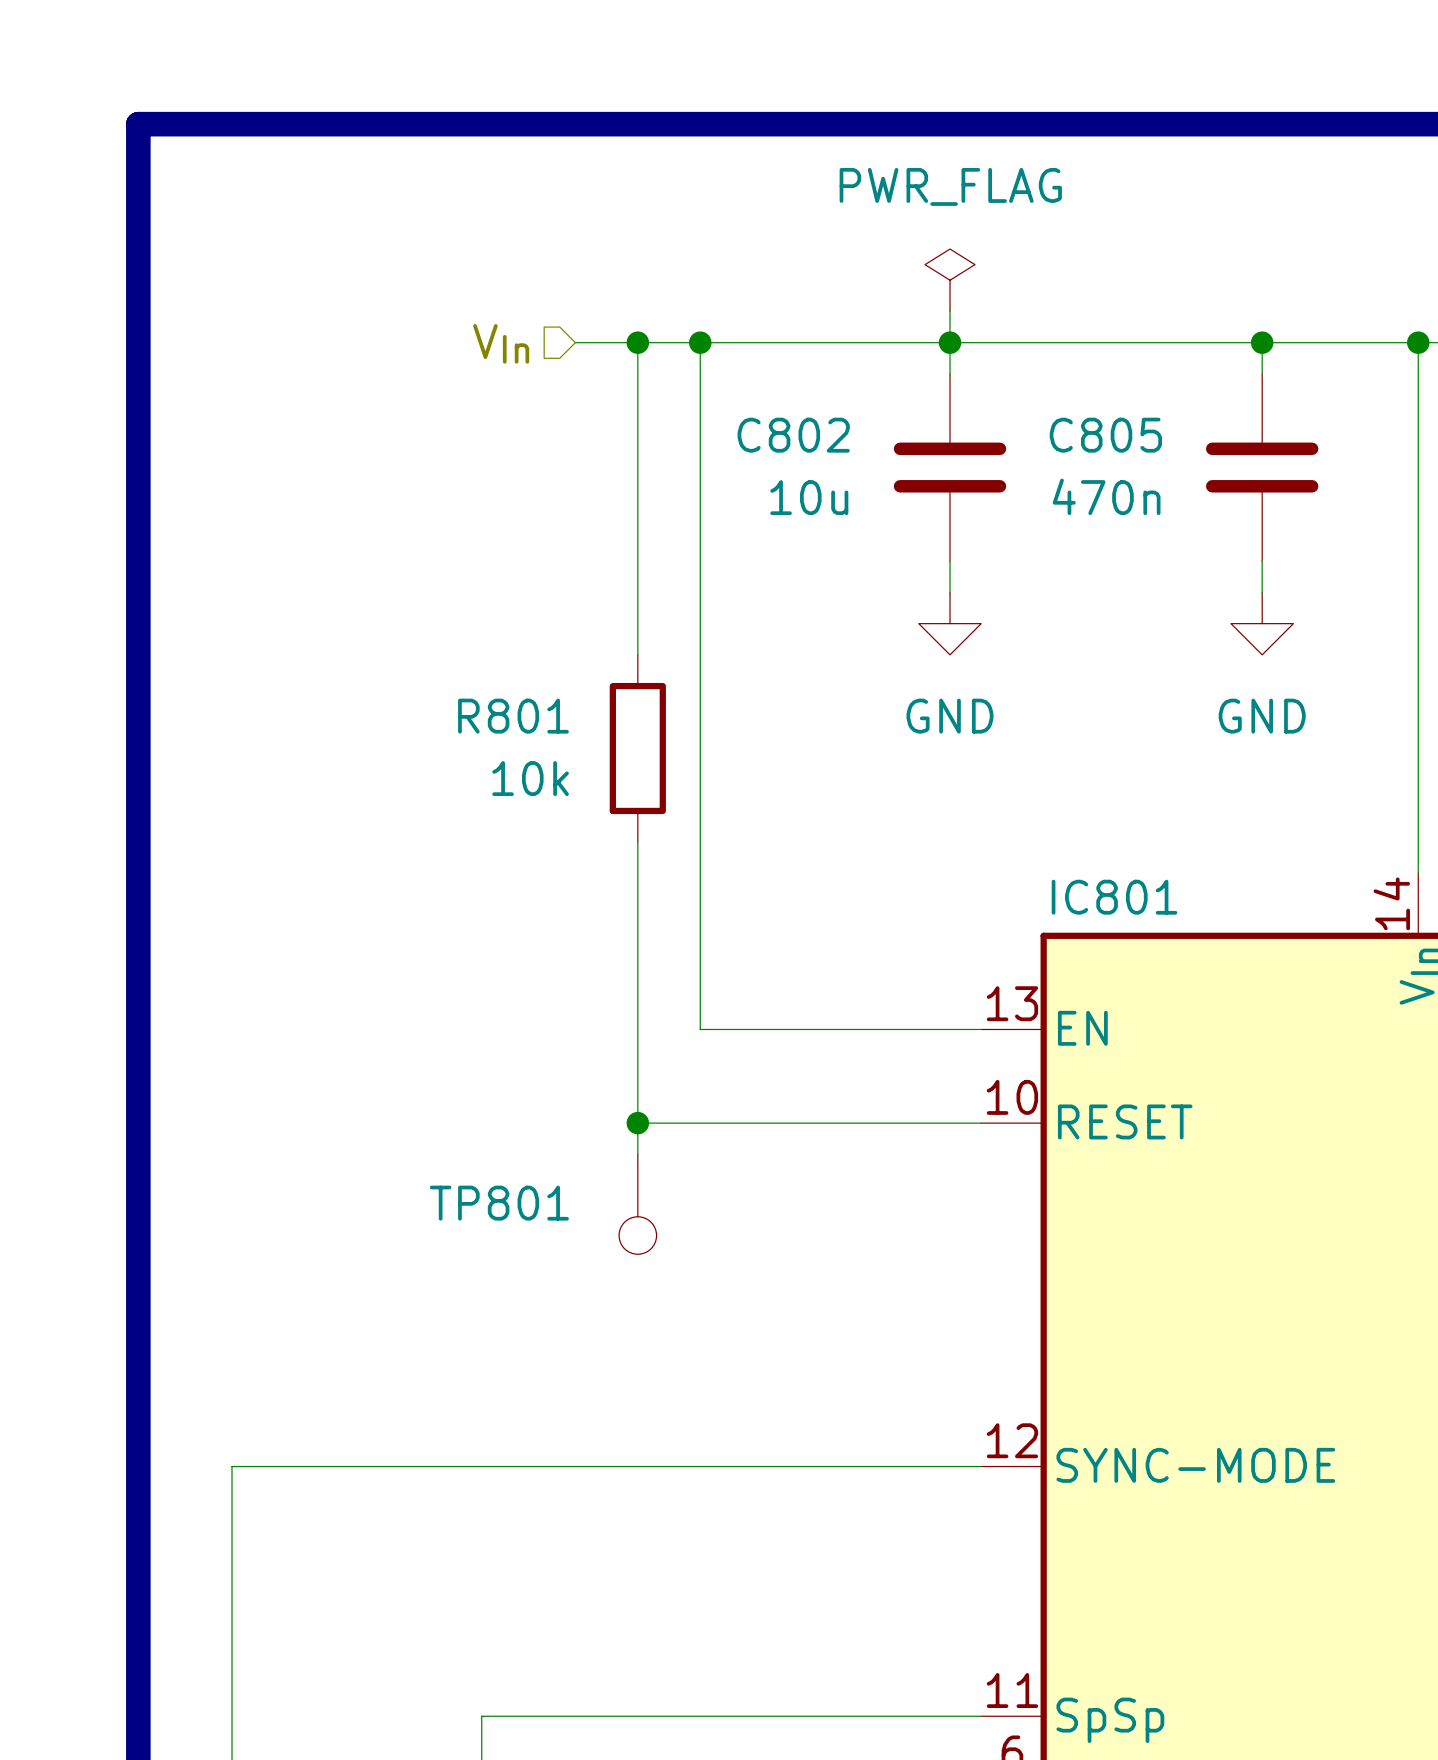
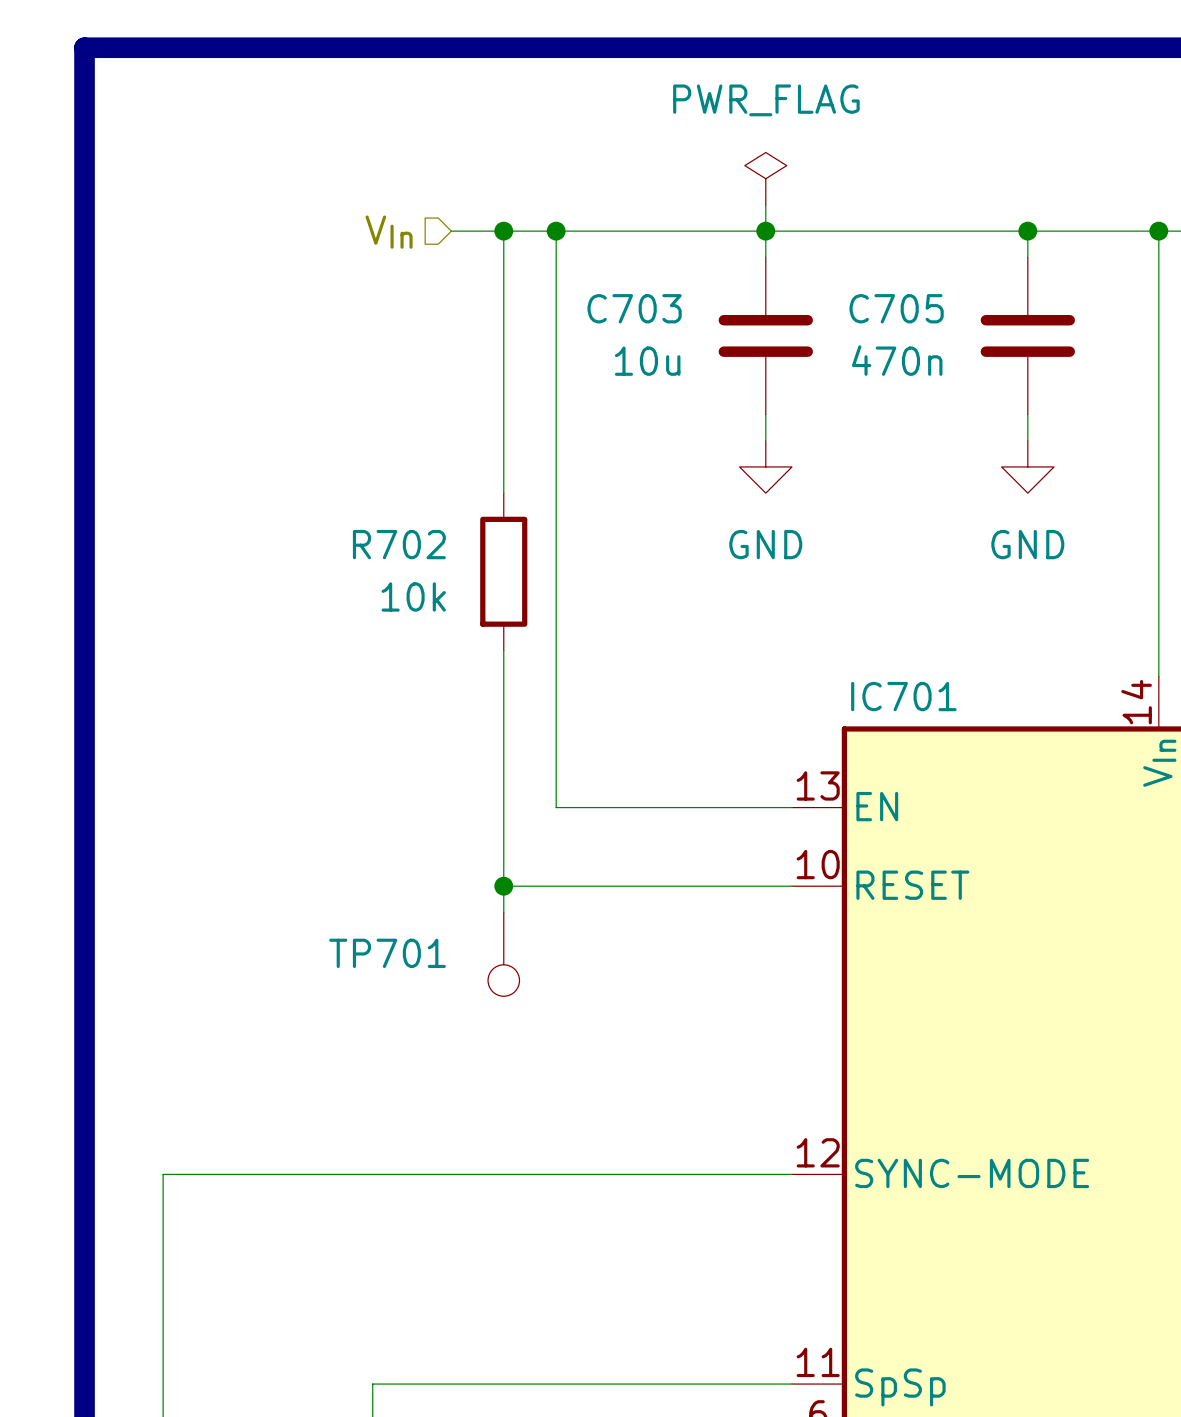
C802 name: C802 (793, 435) -> C703 (634, 308)
C805 name: C805 (1105, 435) -> C705 (896, 308)
R801 name: R801 (513, 716) -> R702 (399, 544)
IC801 name: IC801 (1114, 897) -> IC701 (903, 696)
TP801 name: TP801 (499, 1203) -> TP701 (387, 953)

